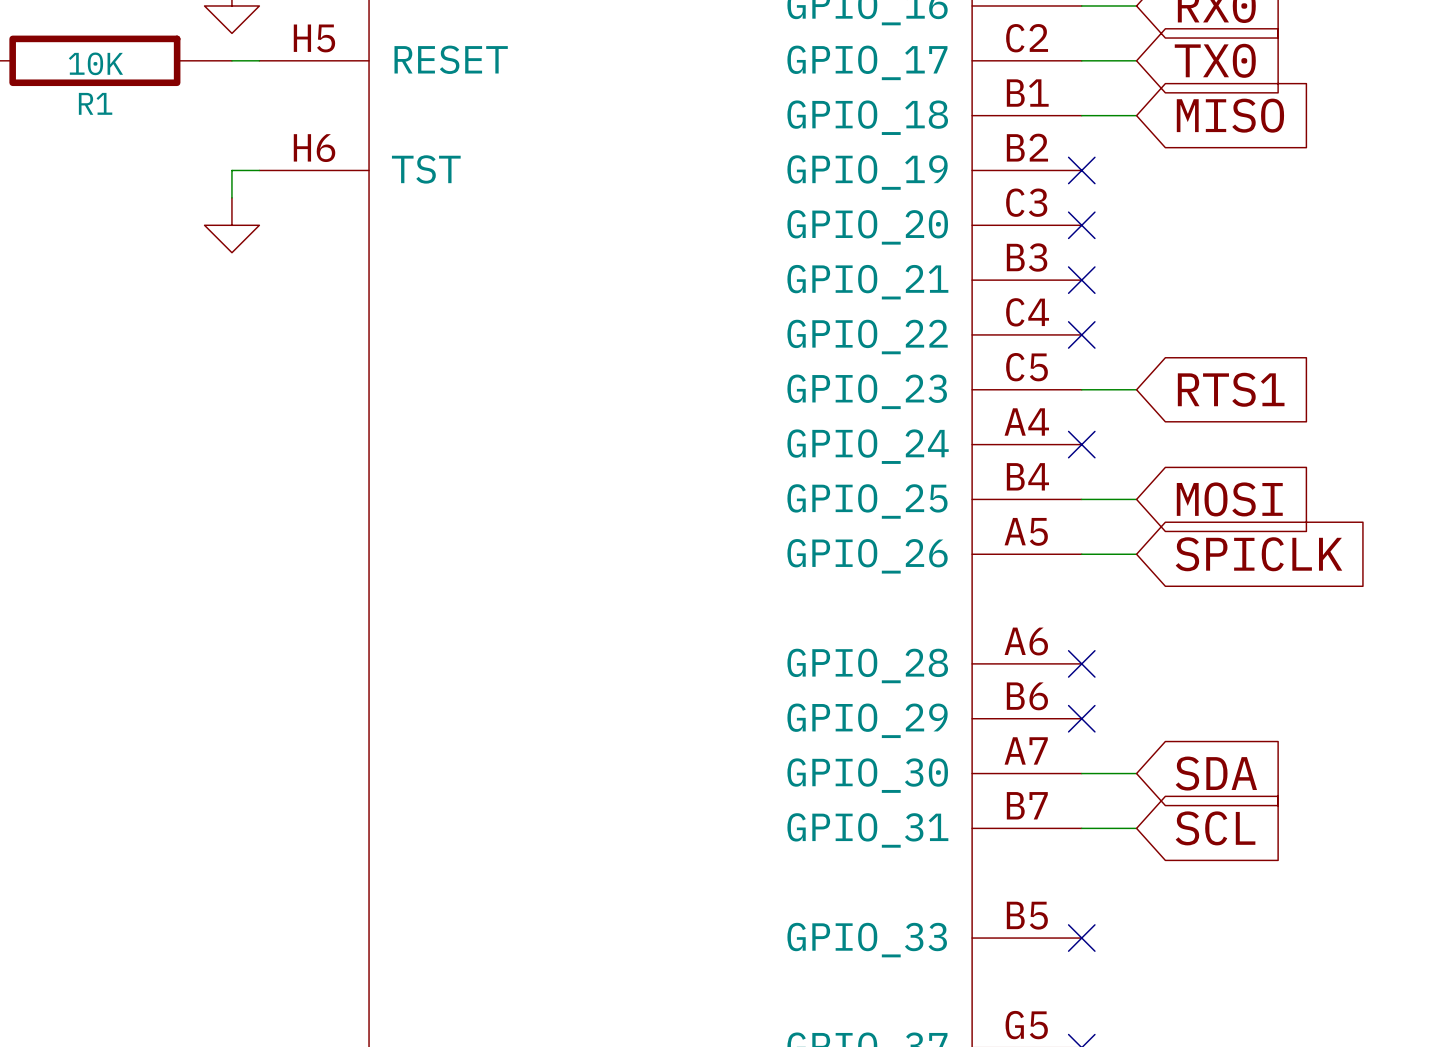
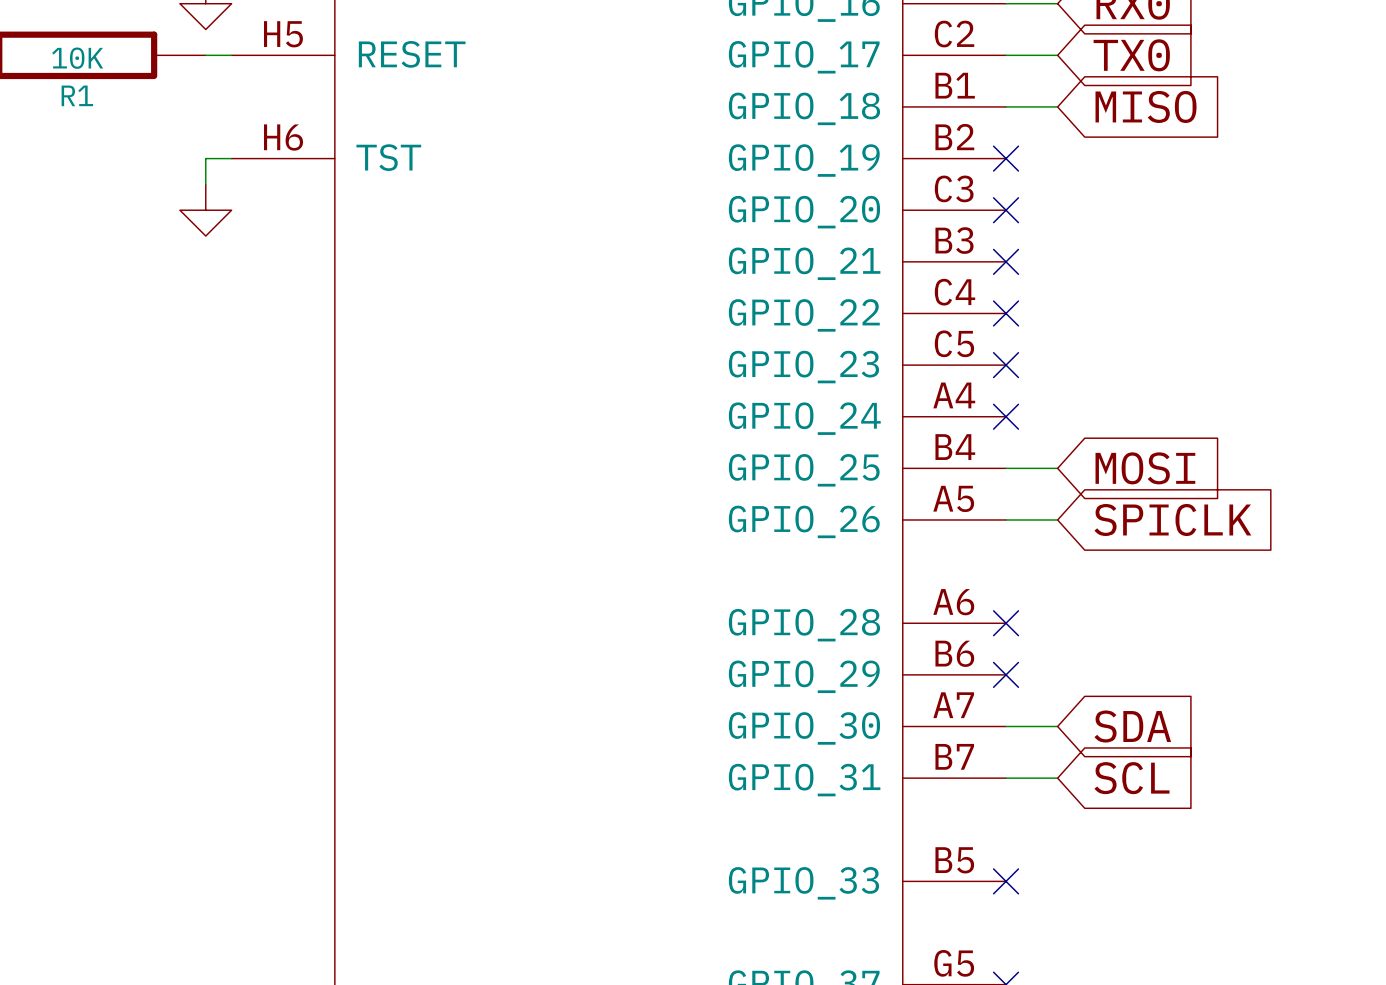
wire: (1081, 389) (1136, 389) -> none
no-connect mark: none -> (1006, 365)
global label: RTS1 (1231, 389) -> none

